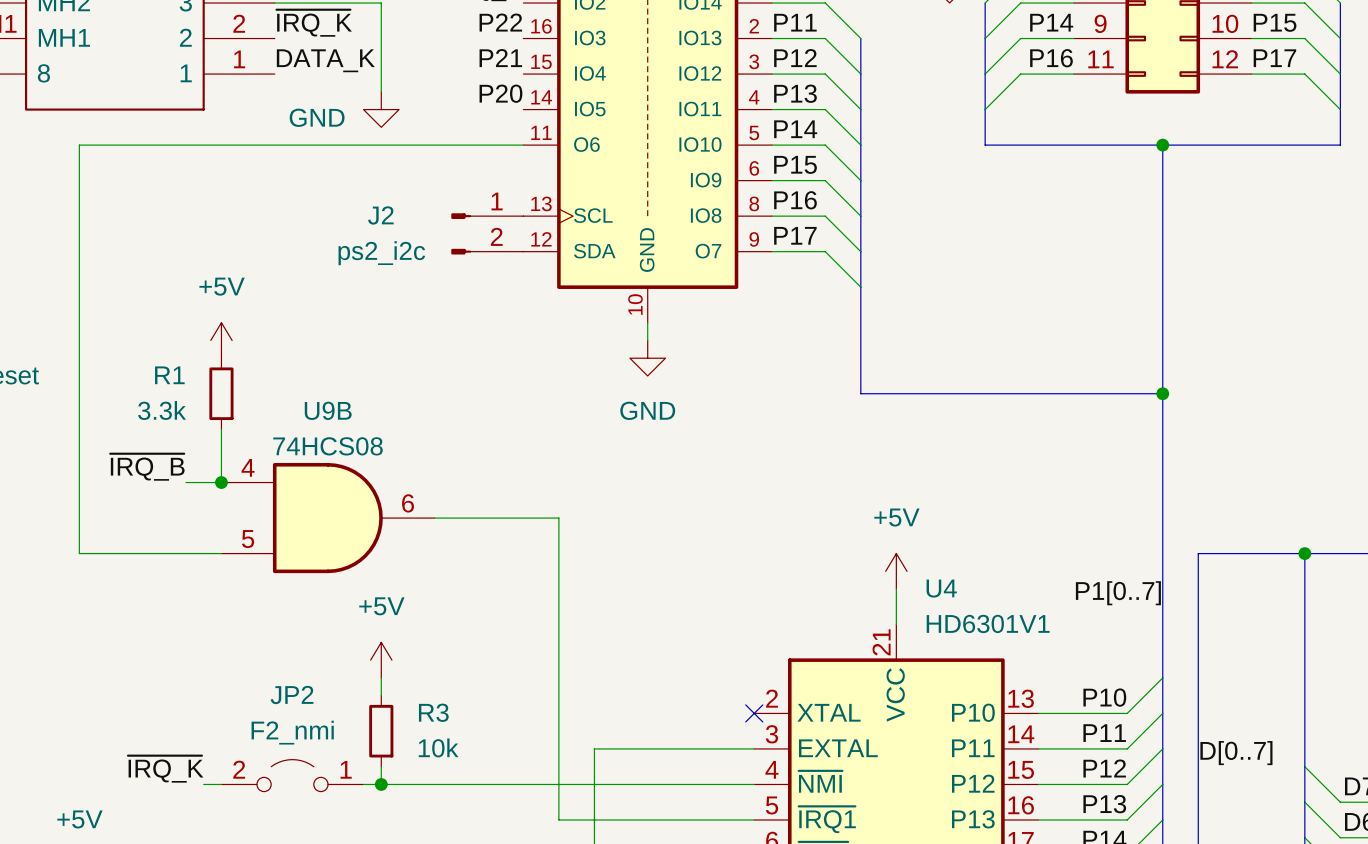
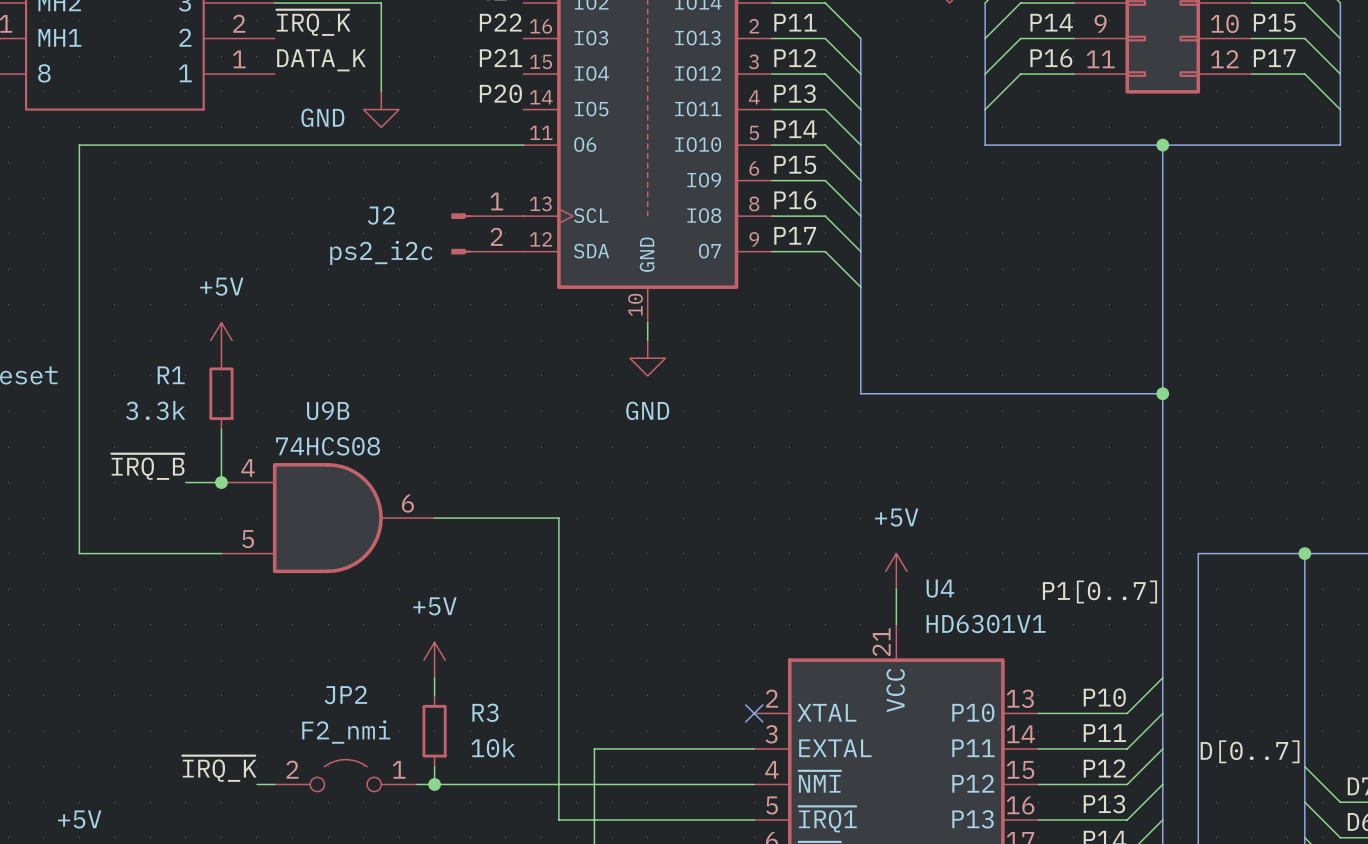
power symbol position: +5V (381, 660) -> +5V (434, 660)
wire: (381, 677) (381, 695) -> (434, 677) (434, 695)
R3 position: (381, 731) -> (434, 731)
wire: (381, 766) (381, 784) -> (434, 766) (434, 784)
label position: ~{IRQ_K} (165, 769) -> ~{IRQ_K} (219, 768)
JP2 position: (292, 775) -> (345, 775)
wire: (203, 784) (221, 784) -> (256, 784) (274, 784)
junction position: (381, 784) -> (434, 784)

